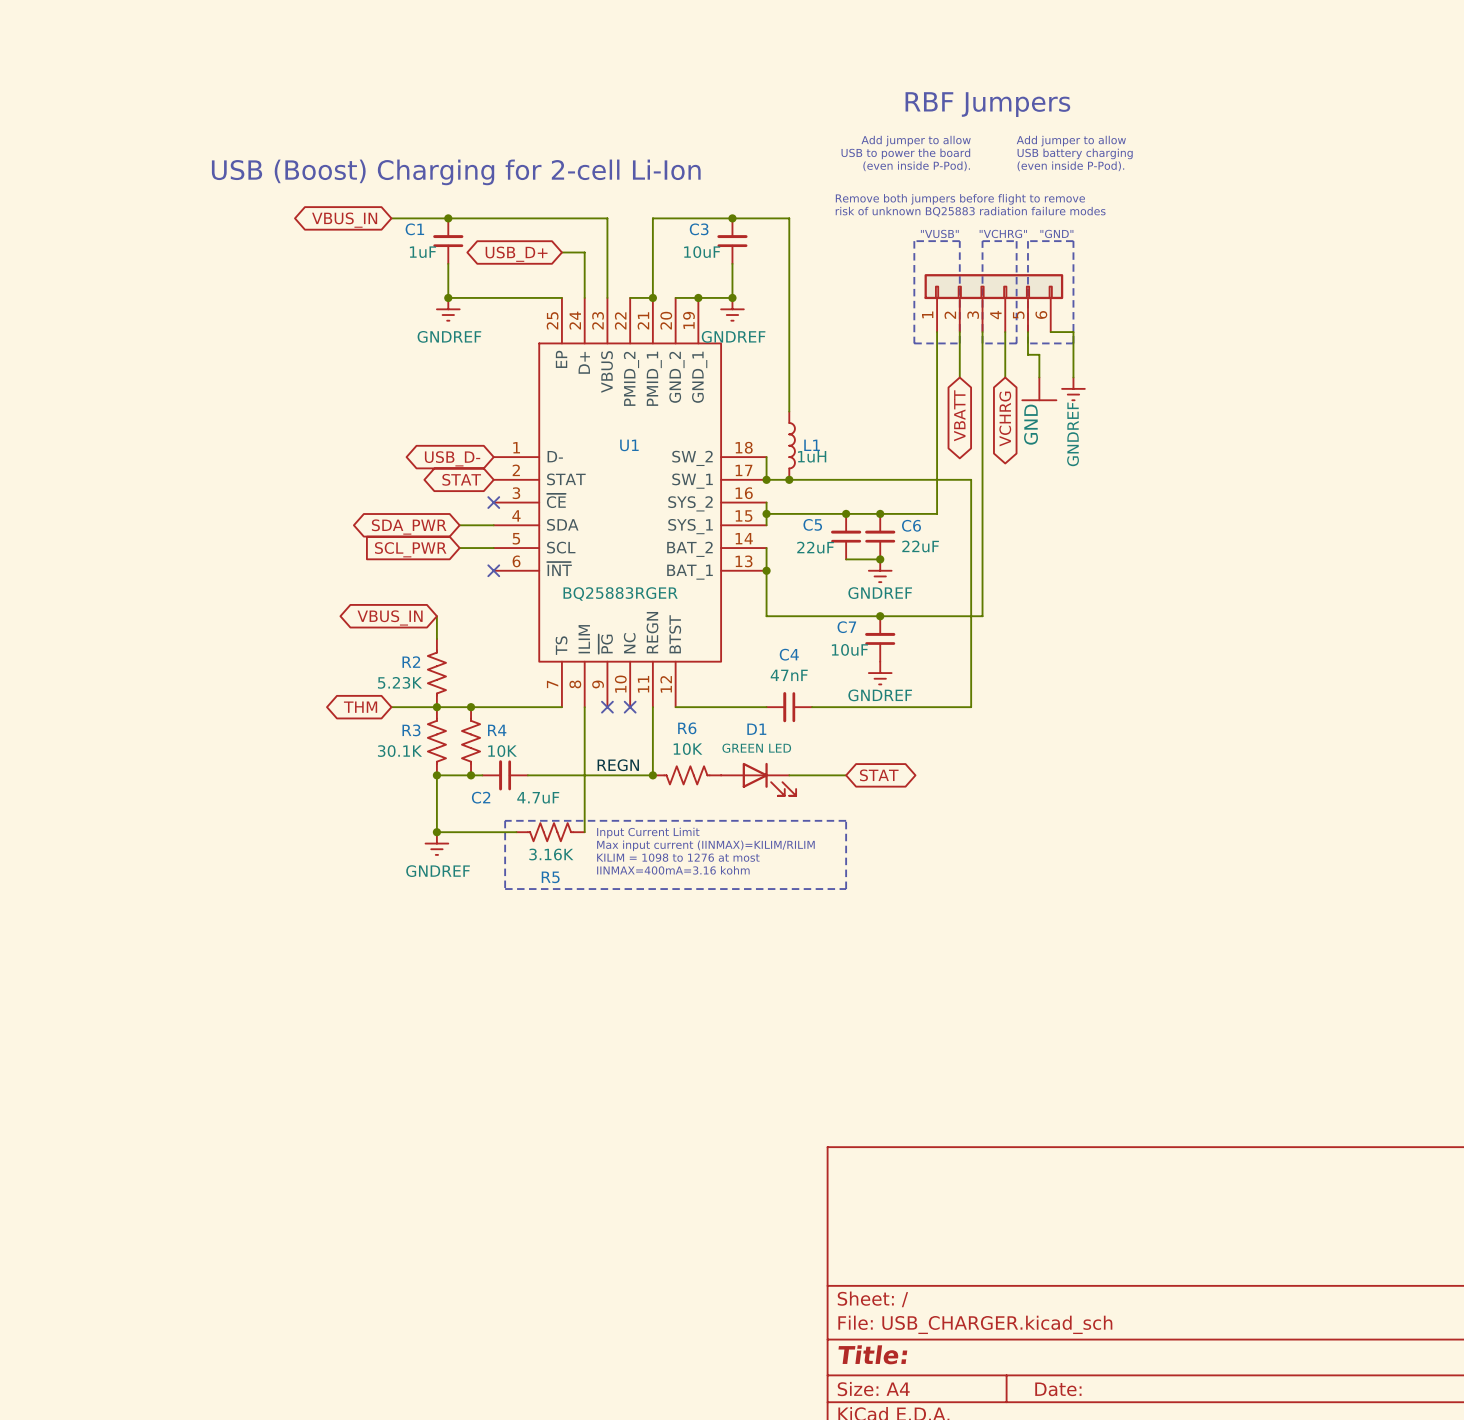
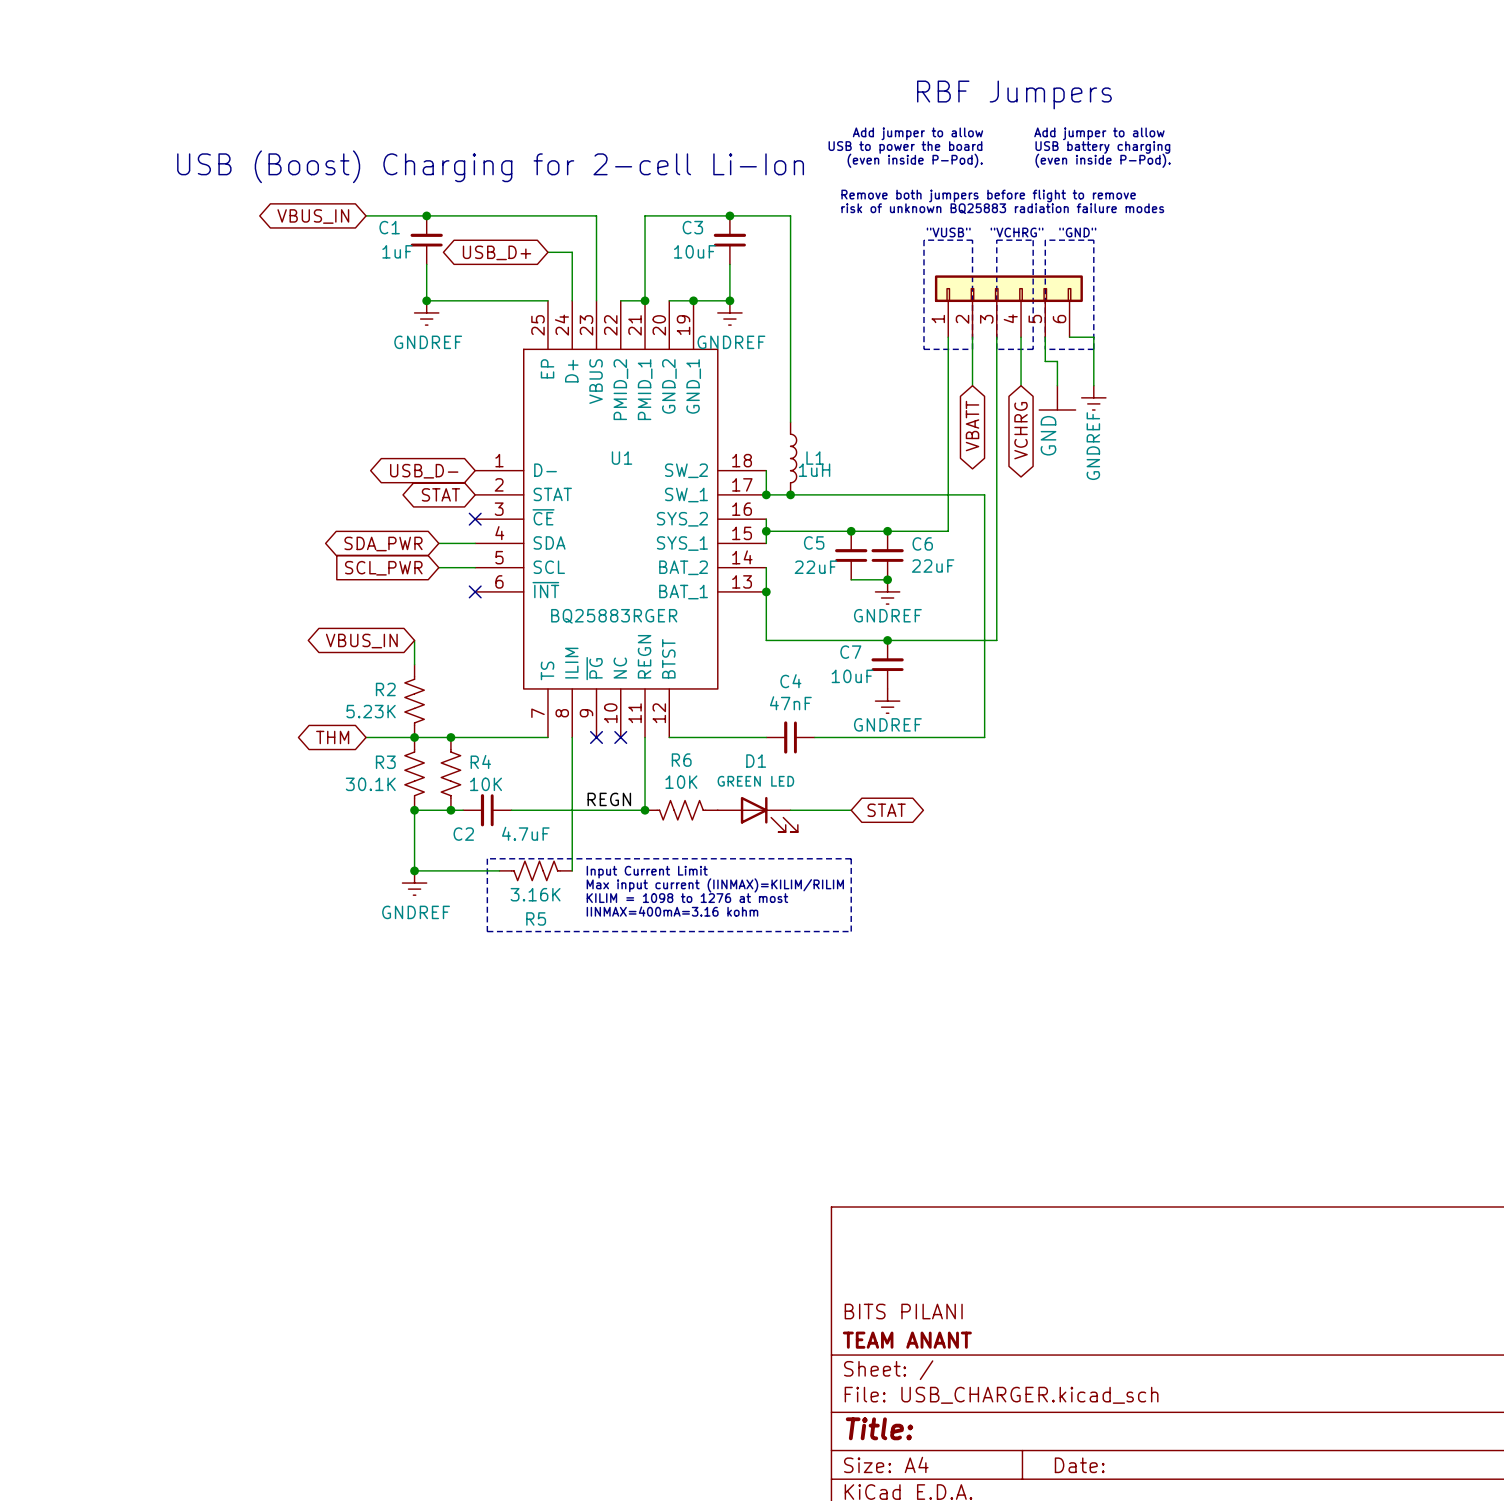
title block: none -> BITS PILANI (903, 1311)
title block: none -> TEAM ANANT (907, 1340)

